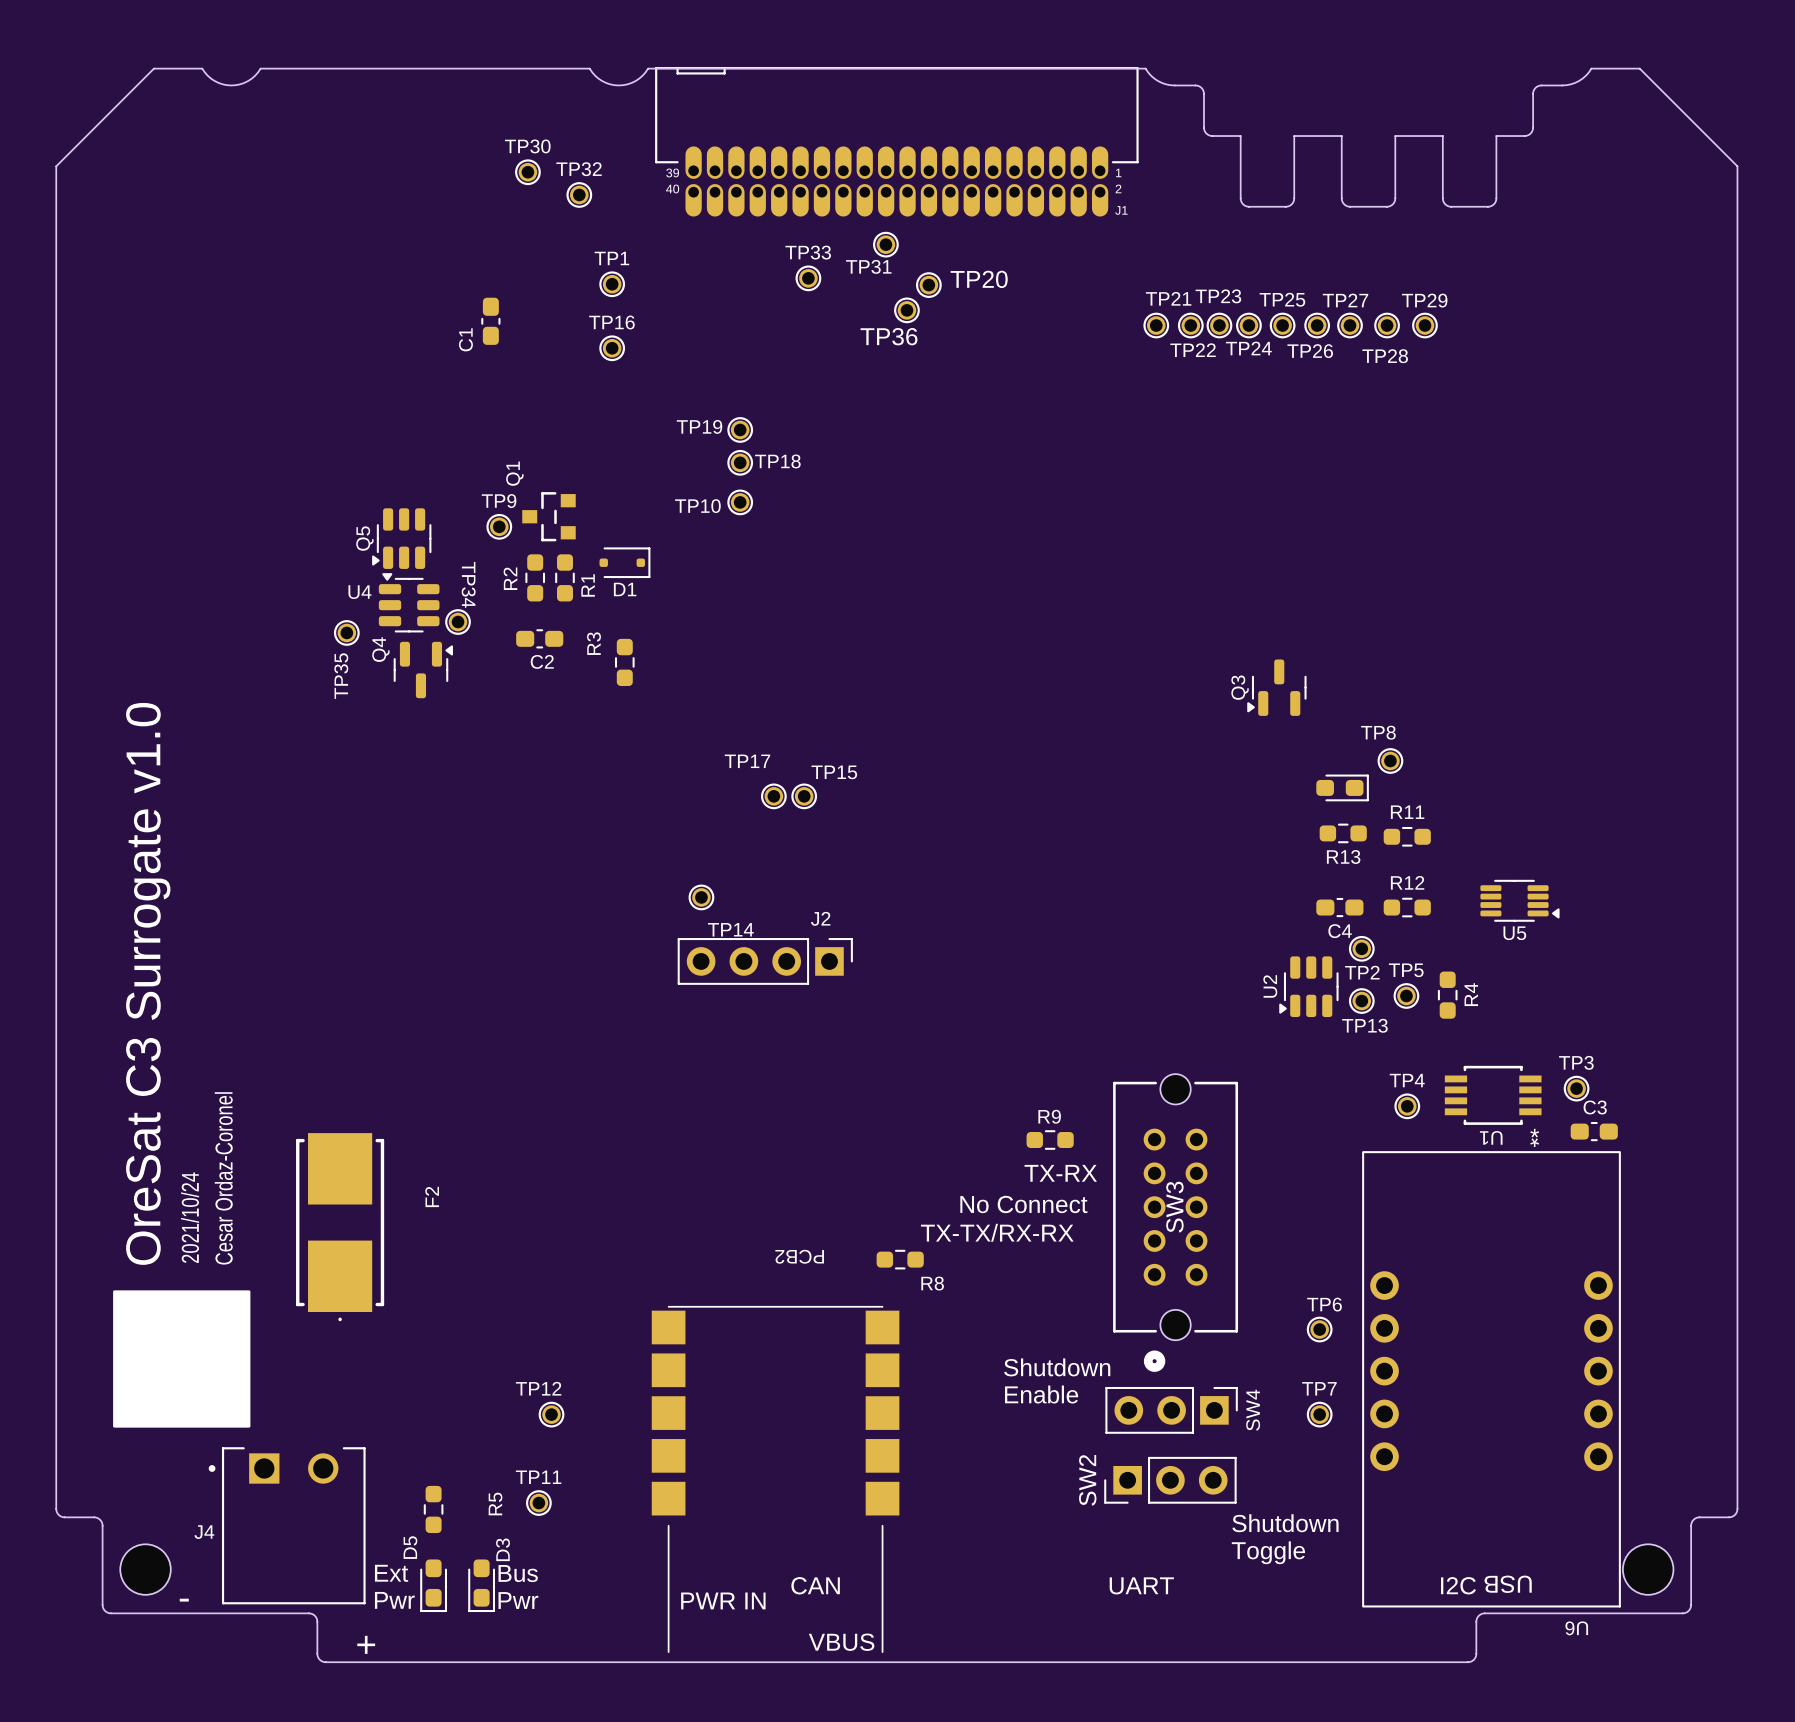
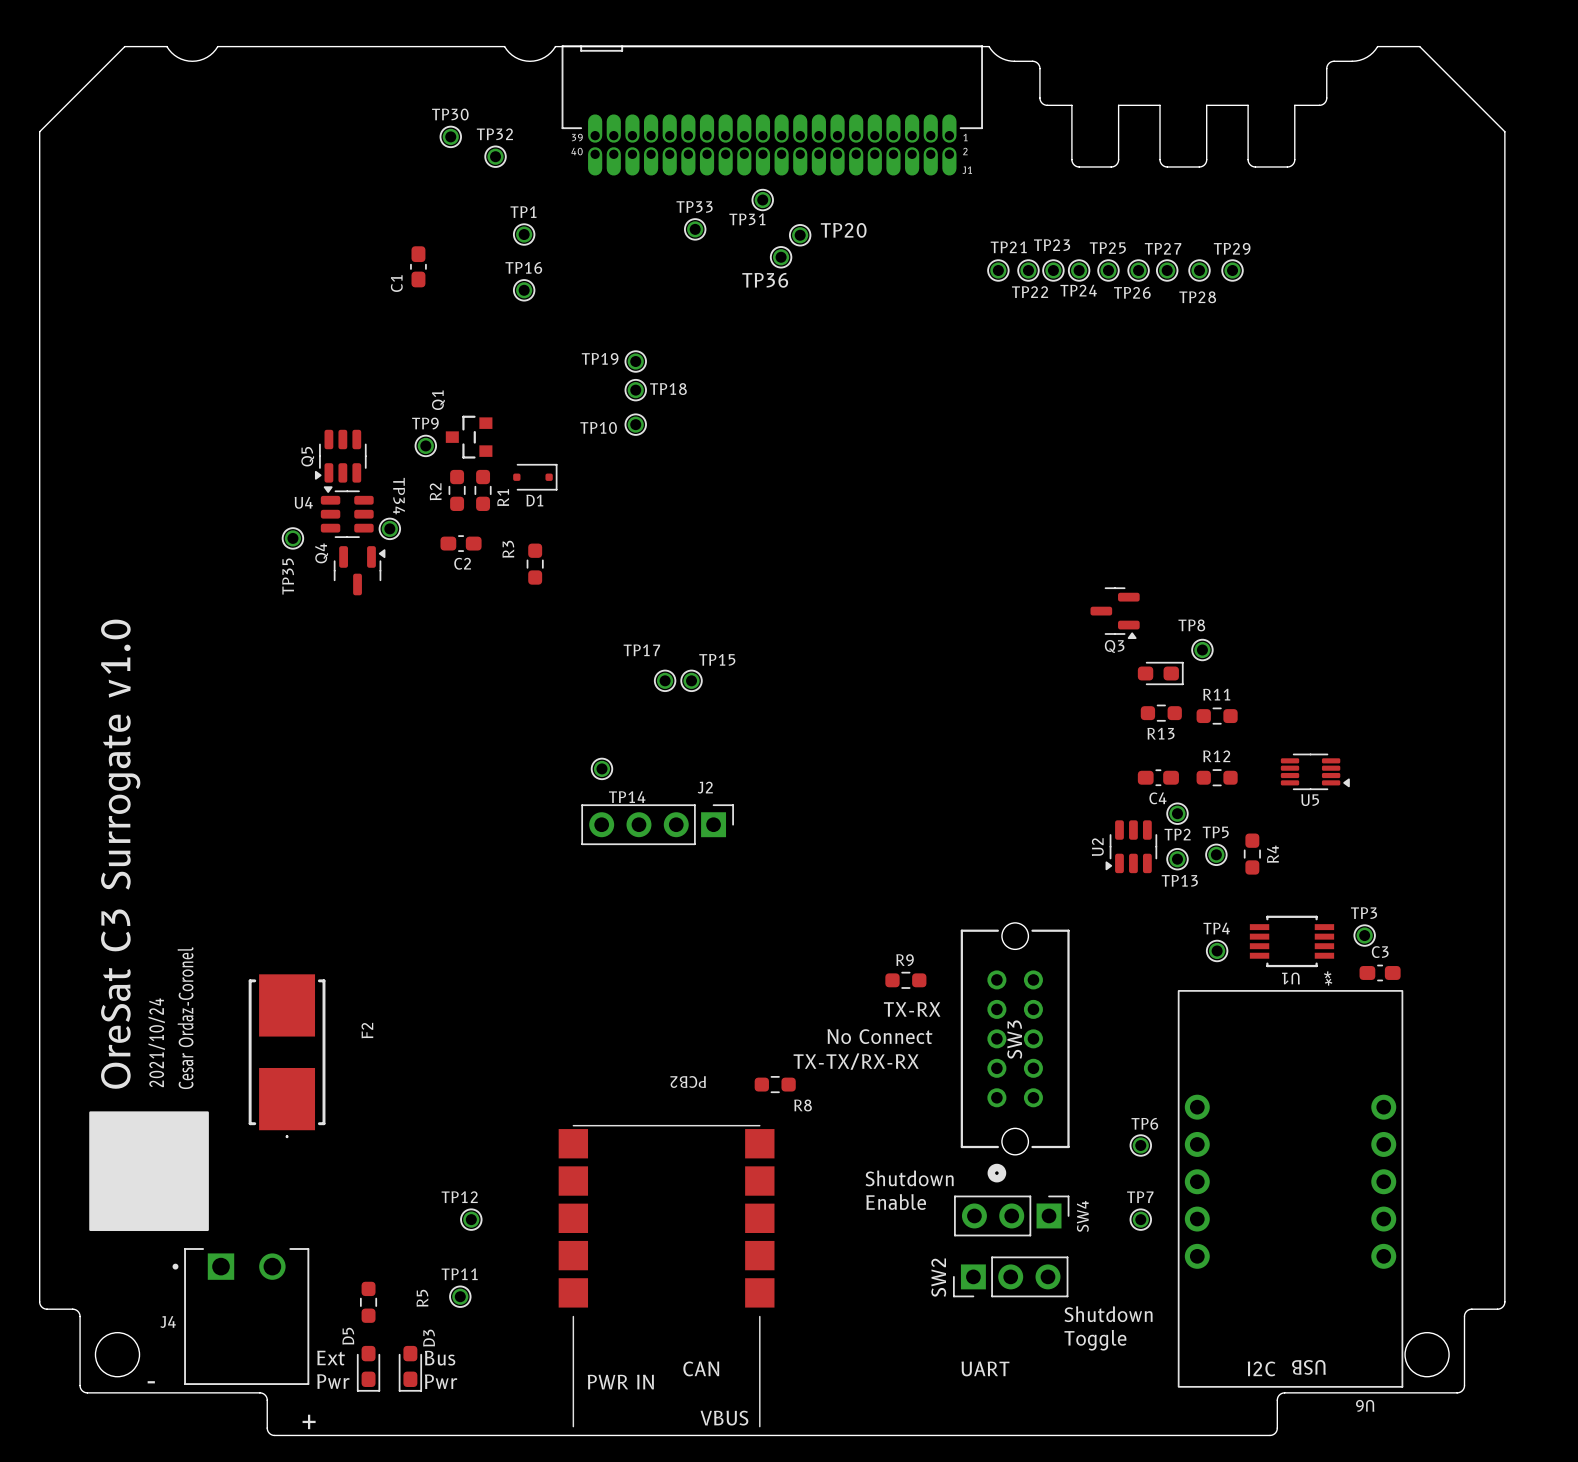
Q3 rotation: 0° (1276, 687) -> 90° counterclockwise (1115, 613)

